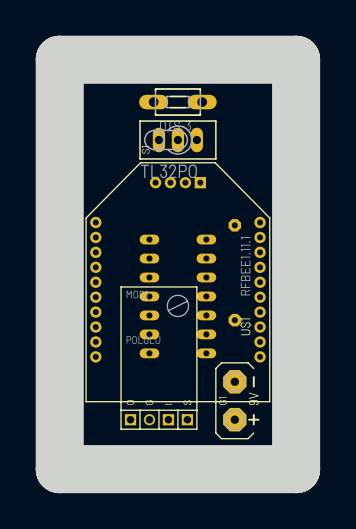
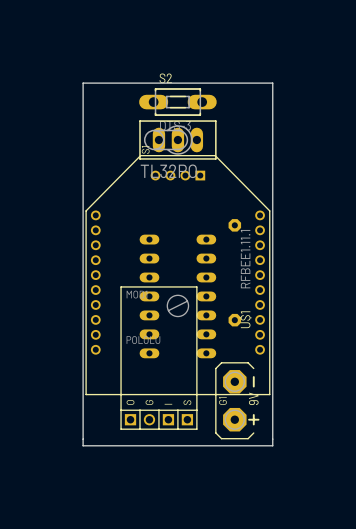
board edge: (59, 59) (59, 469) (296, 469) (296, 59) (59, 59) -> none
U$1 footprint: [85, 162, 271, 403] -> [85, 155, 271, 396]
part footprint: [149, 176, 207, 189] -> [150, 170, 206, 181]

